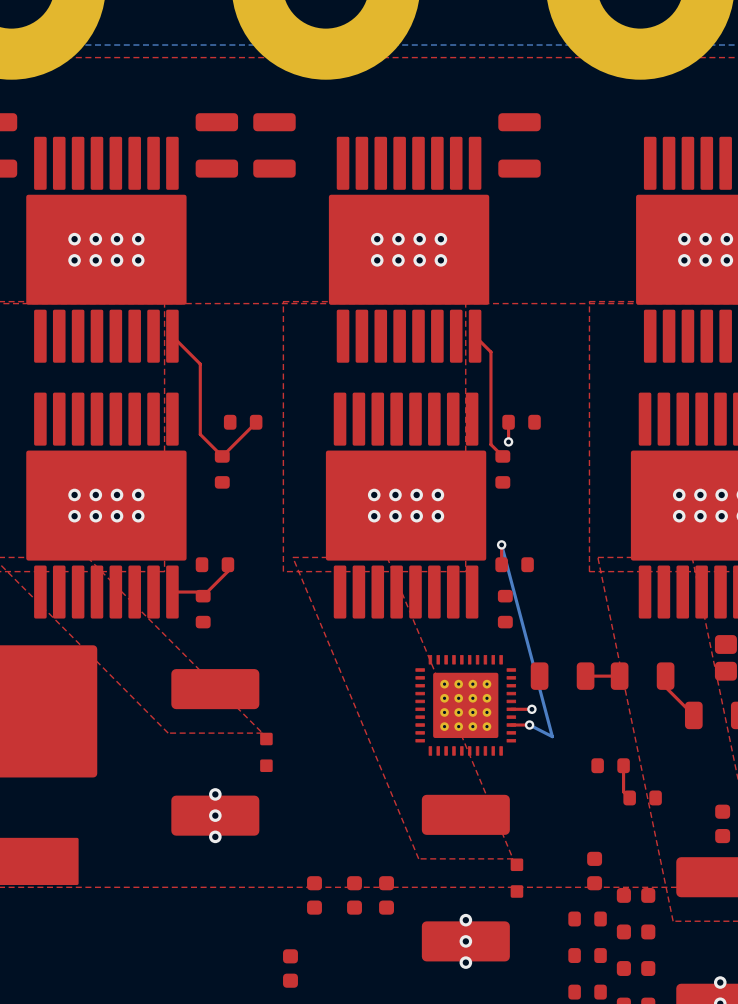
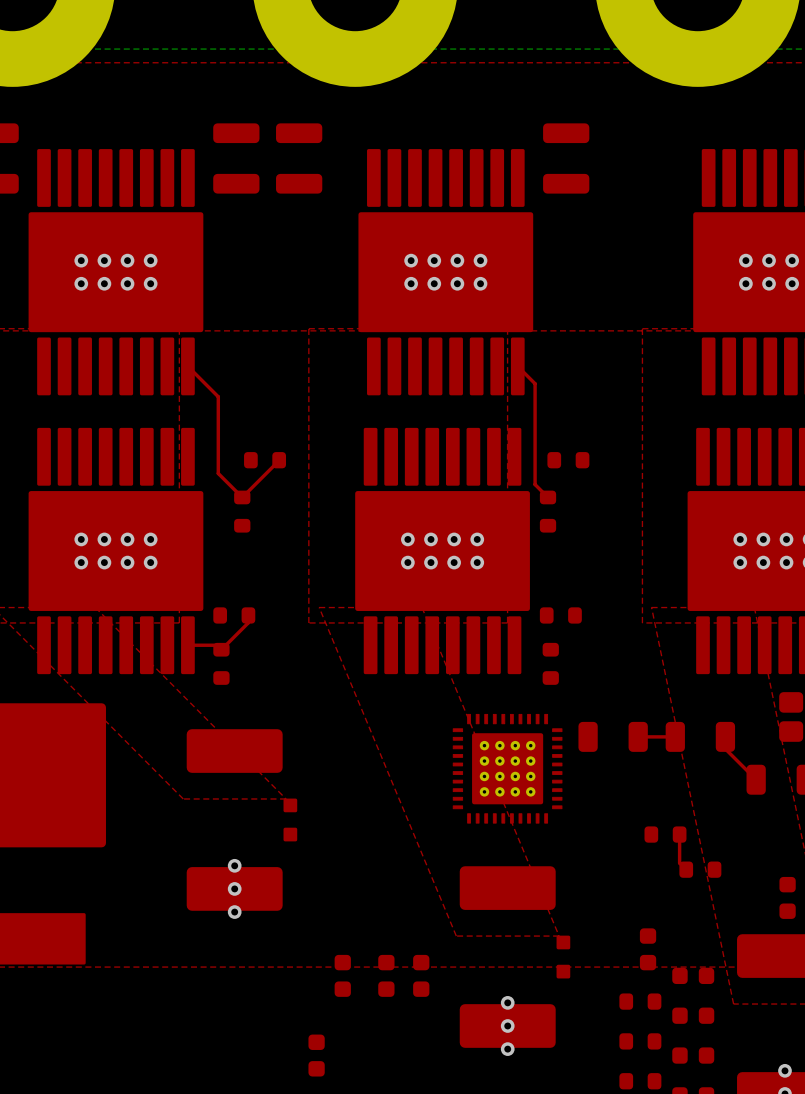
top track: (508, 422) (508, 441) -> none
via: (508, 441) -> none
top track: (501, 544) (501, 564) -> none
bottom track: (501, 544) (552, 736) (529, 725) -> none
via: (501, 544) -> none
top track: (511, 709) (531, 709) -> none
via: (531, 709) -> none
top track: (511, 725) (529, 725) -> none
via: (529, 725) -> none

